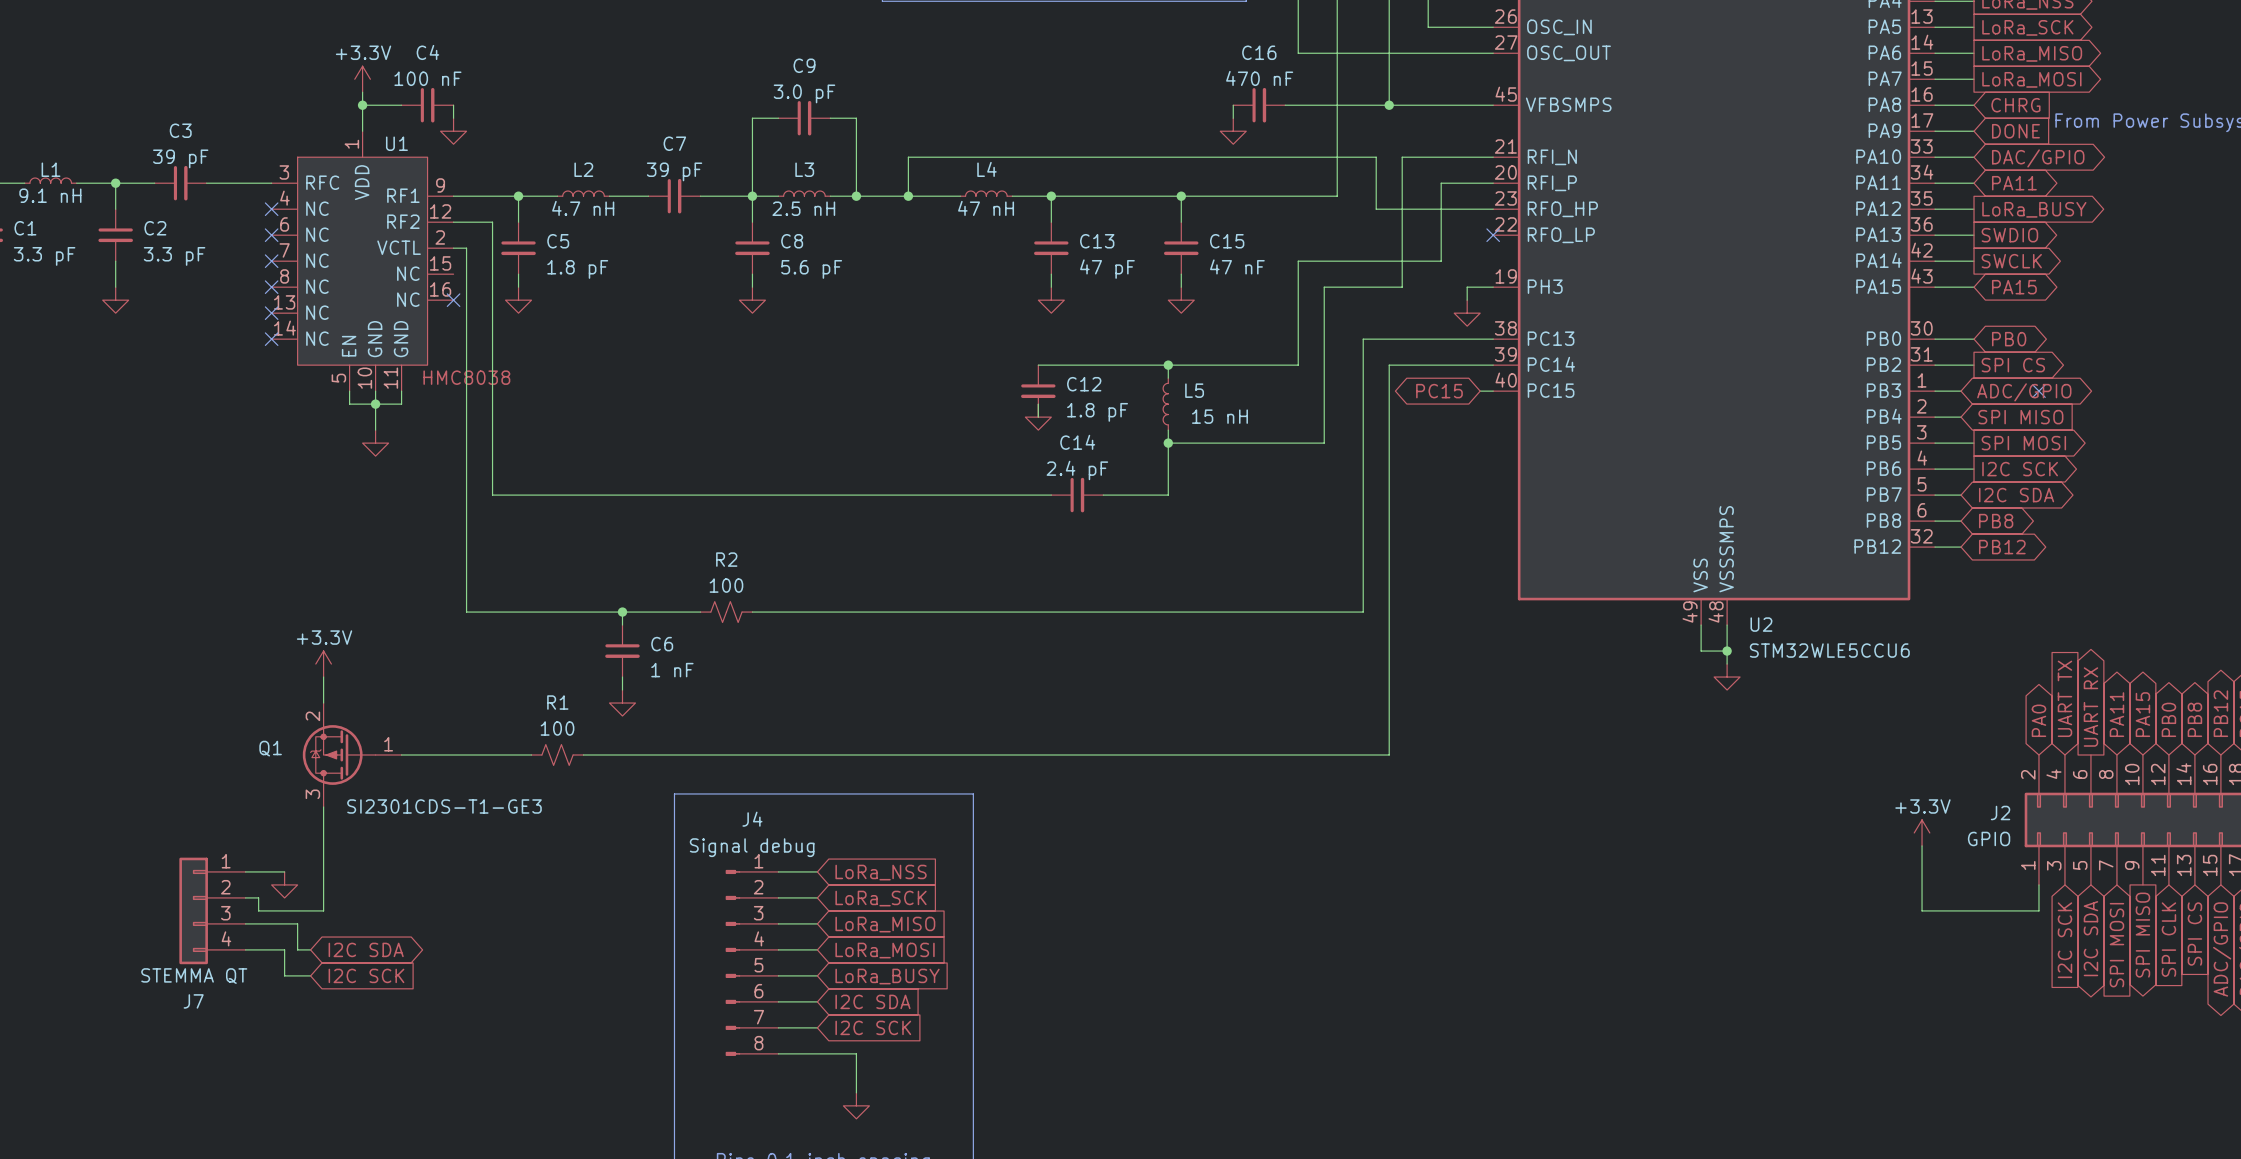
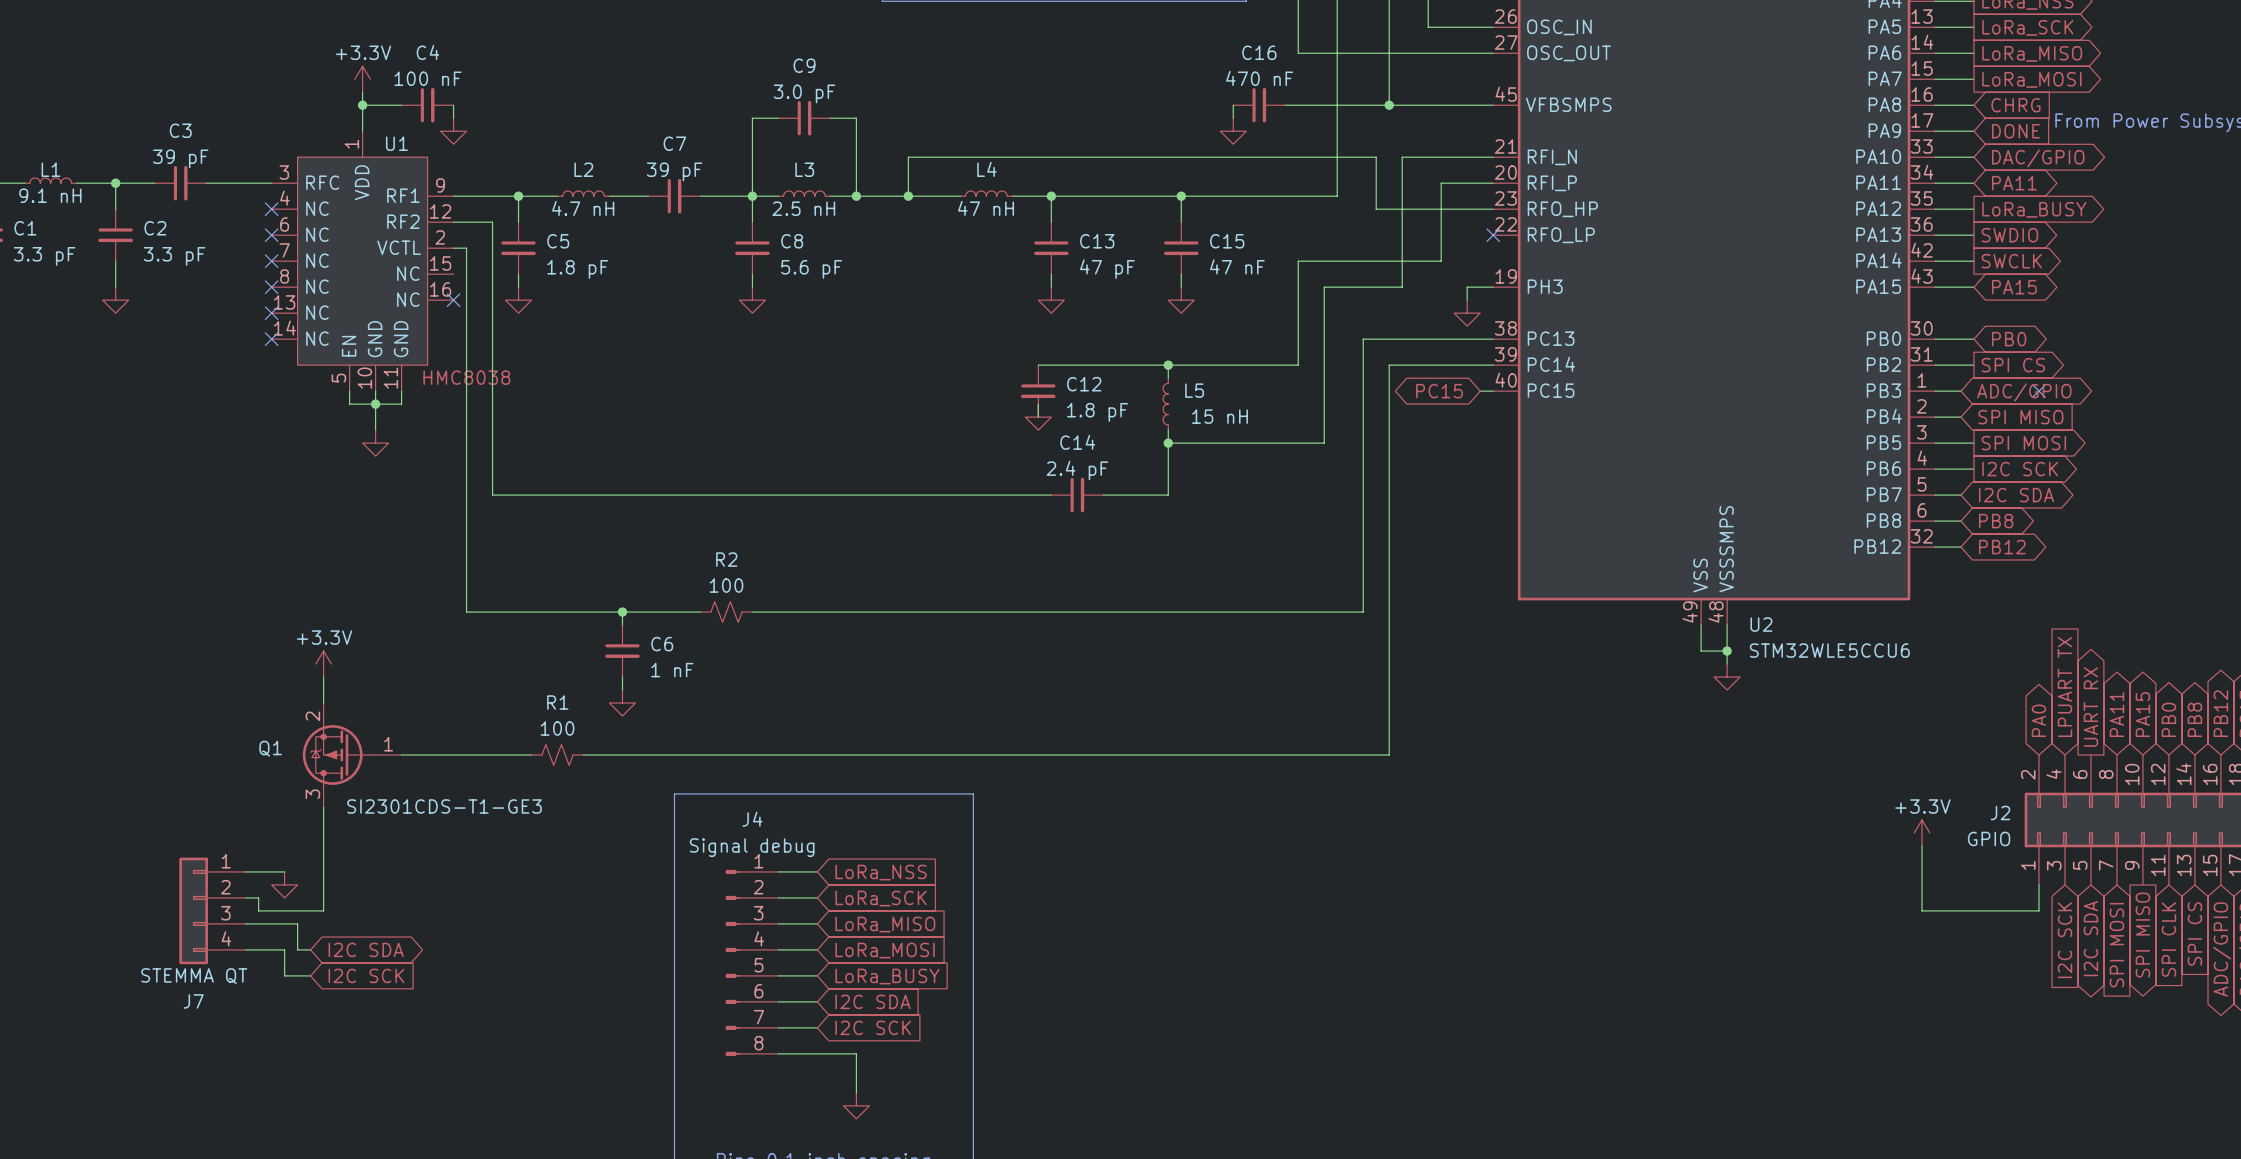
global label: UART TX (2064, 698) -> LPUART TX (2064, 687)

